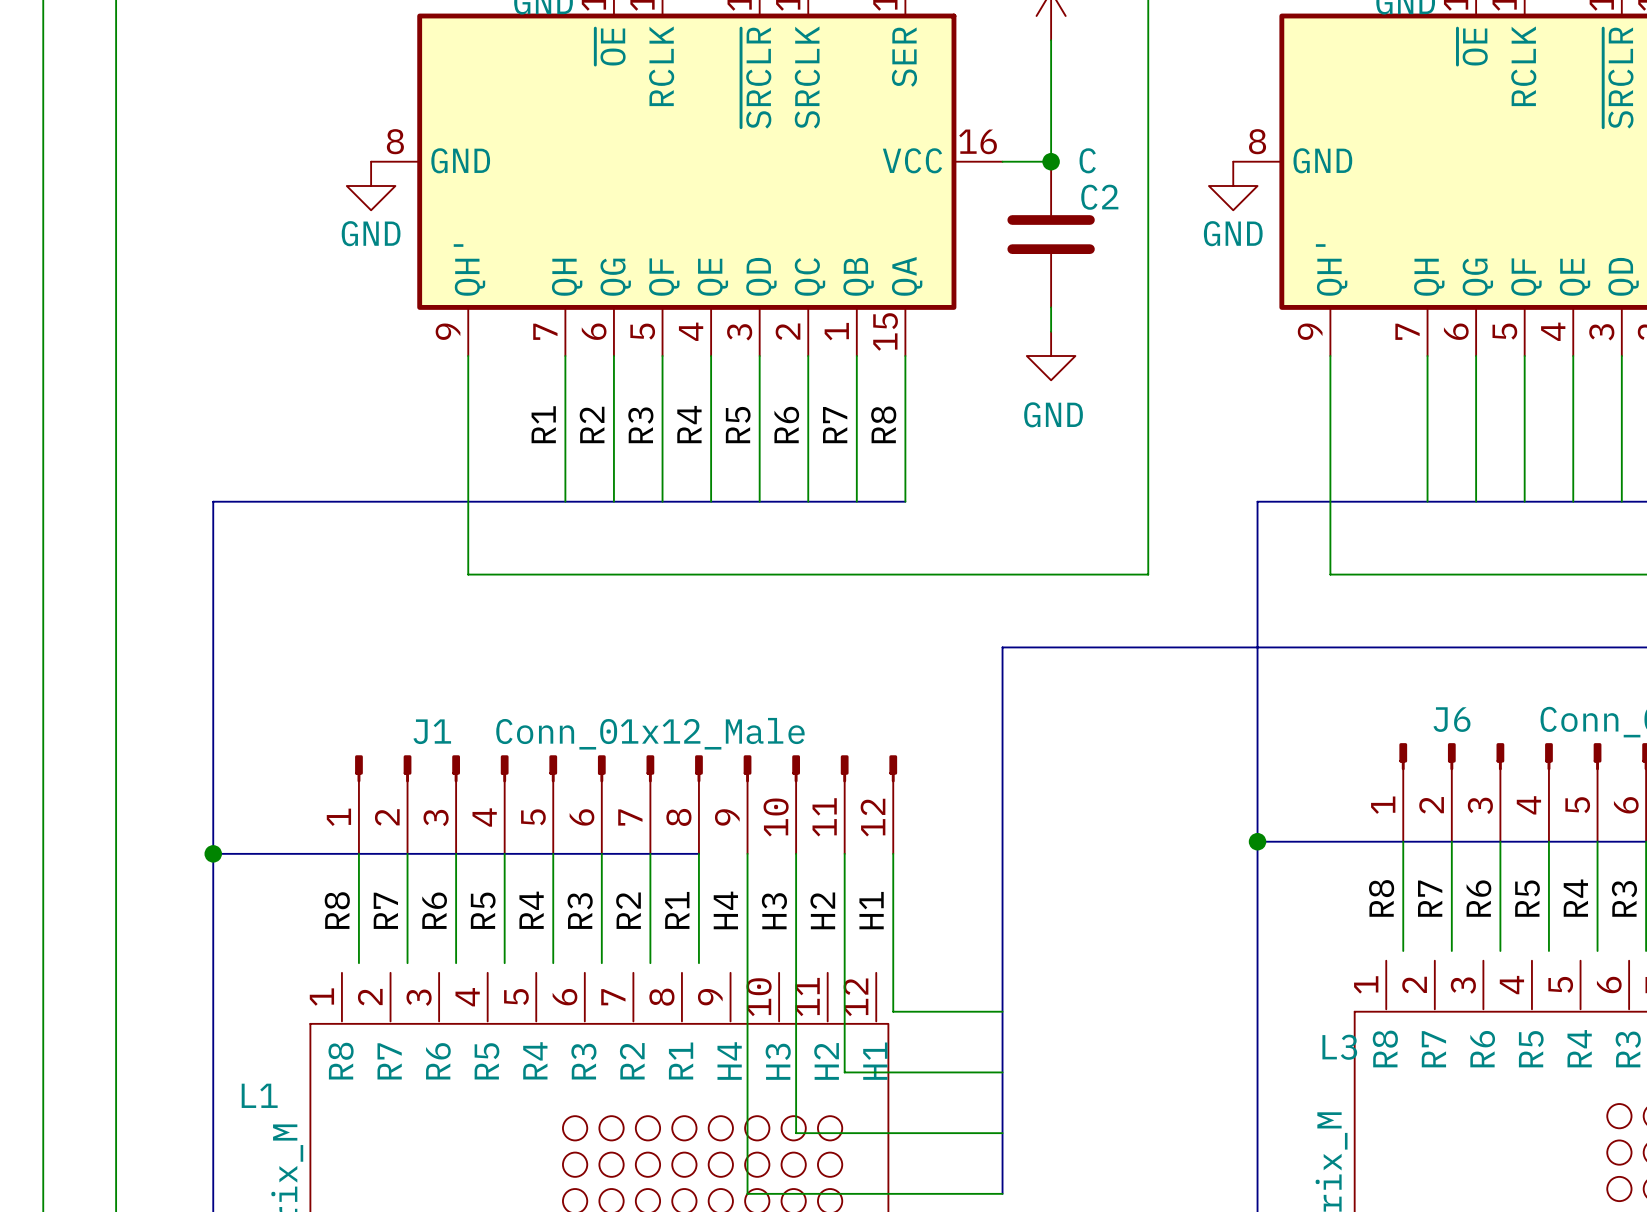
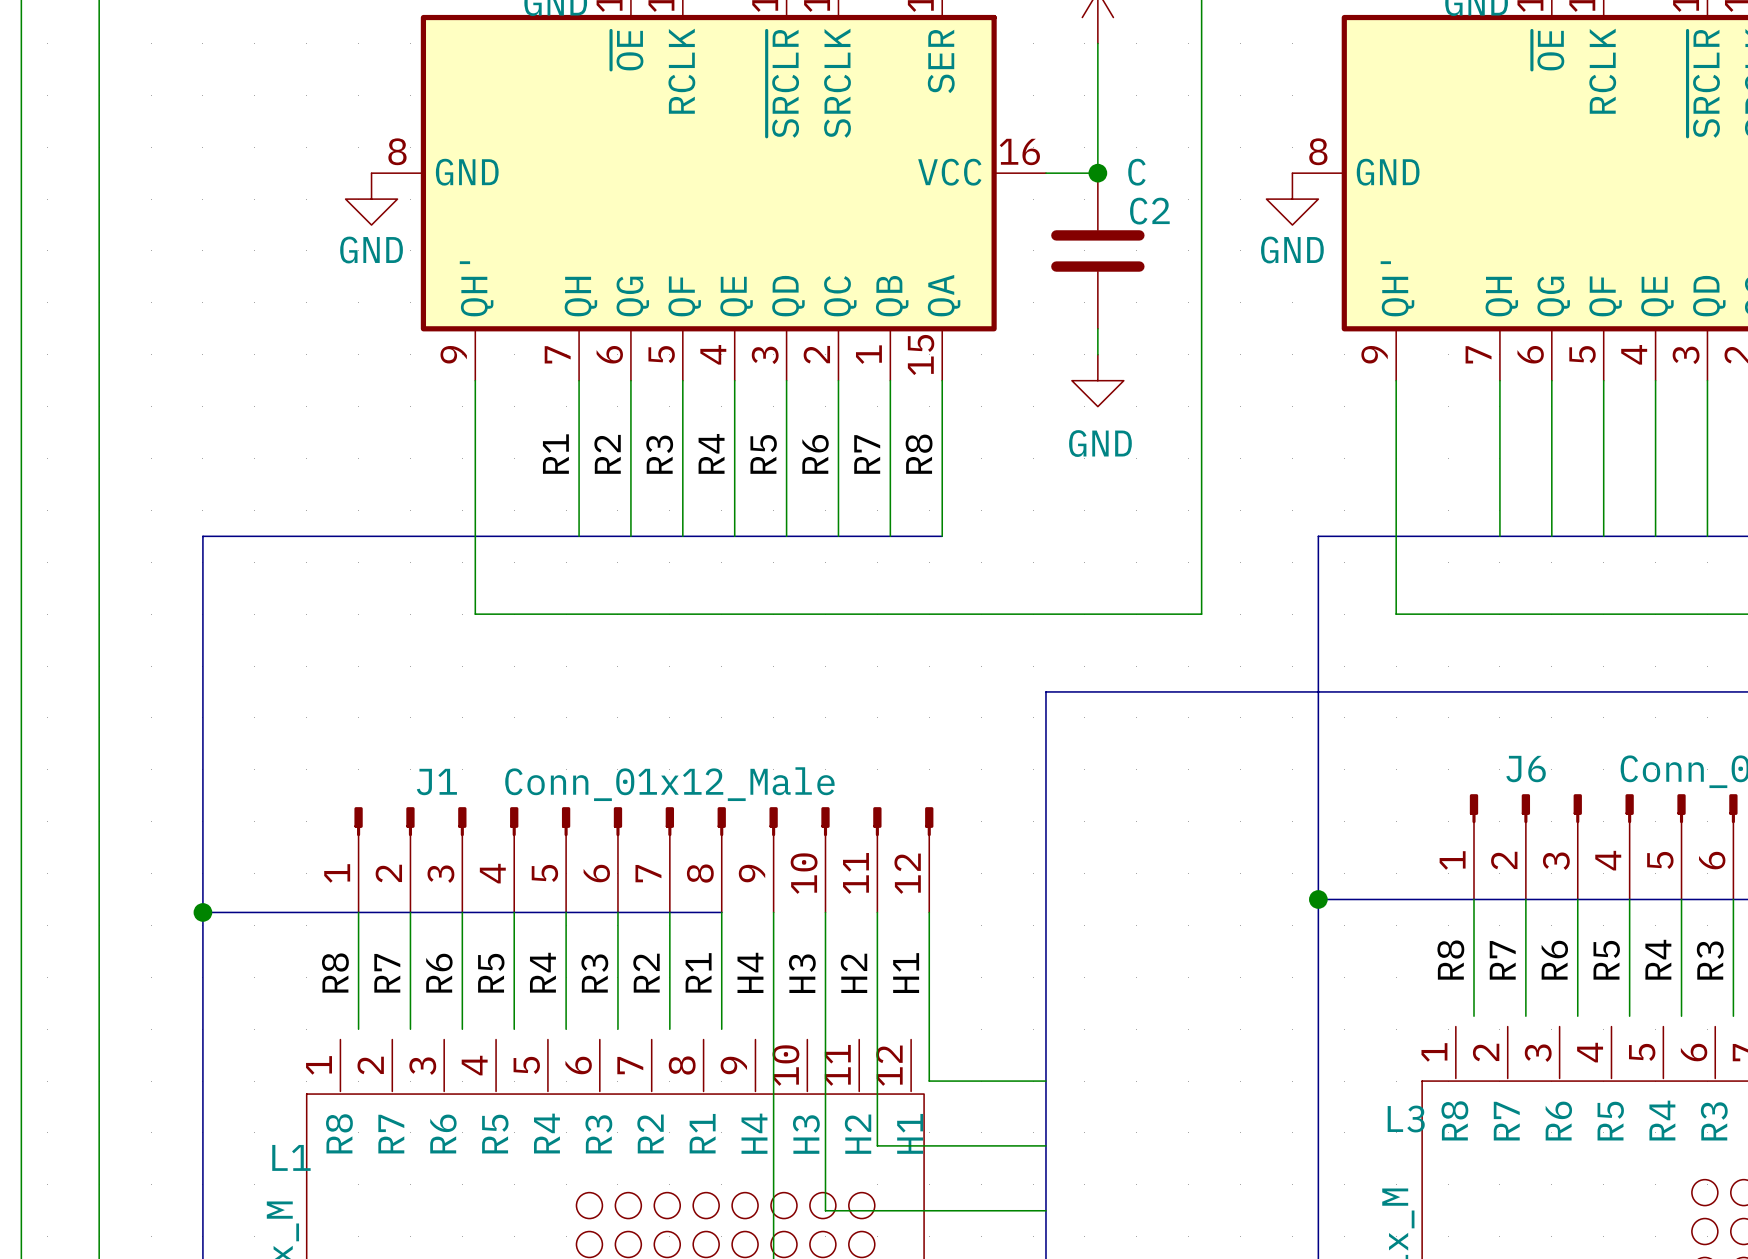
L1 name position: L1 (259, 1095) -> L1 (291, 1157)

